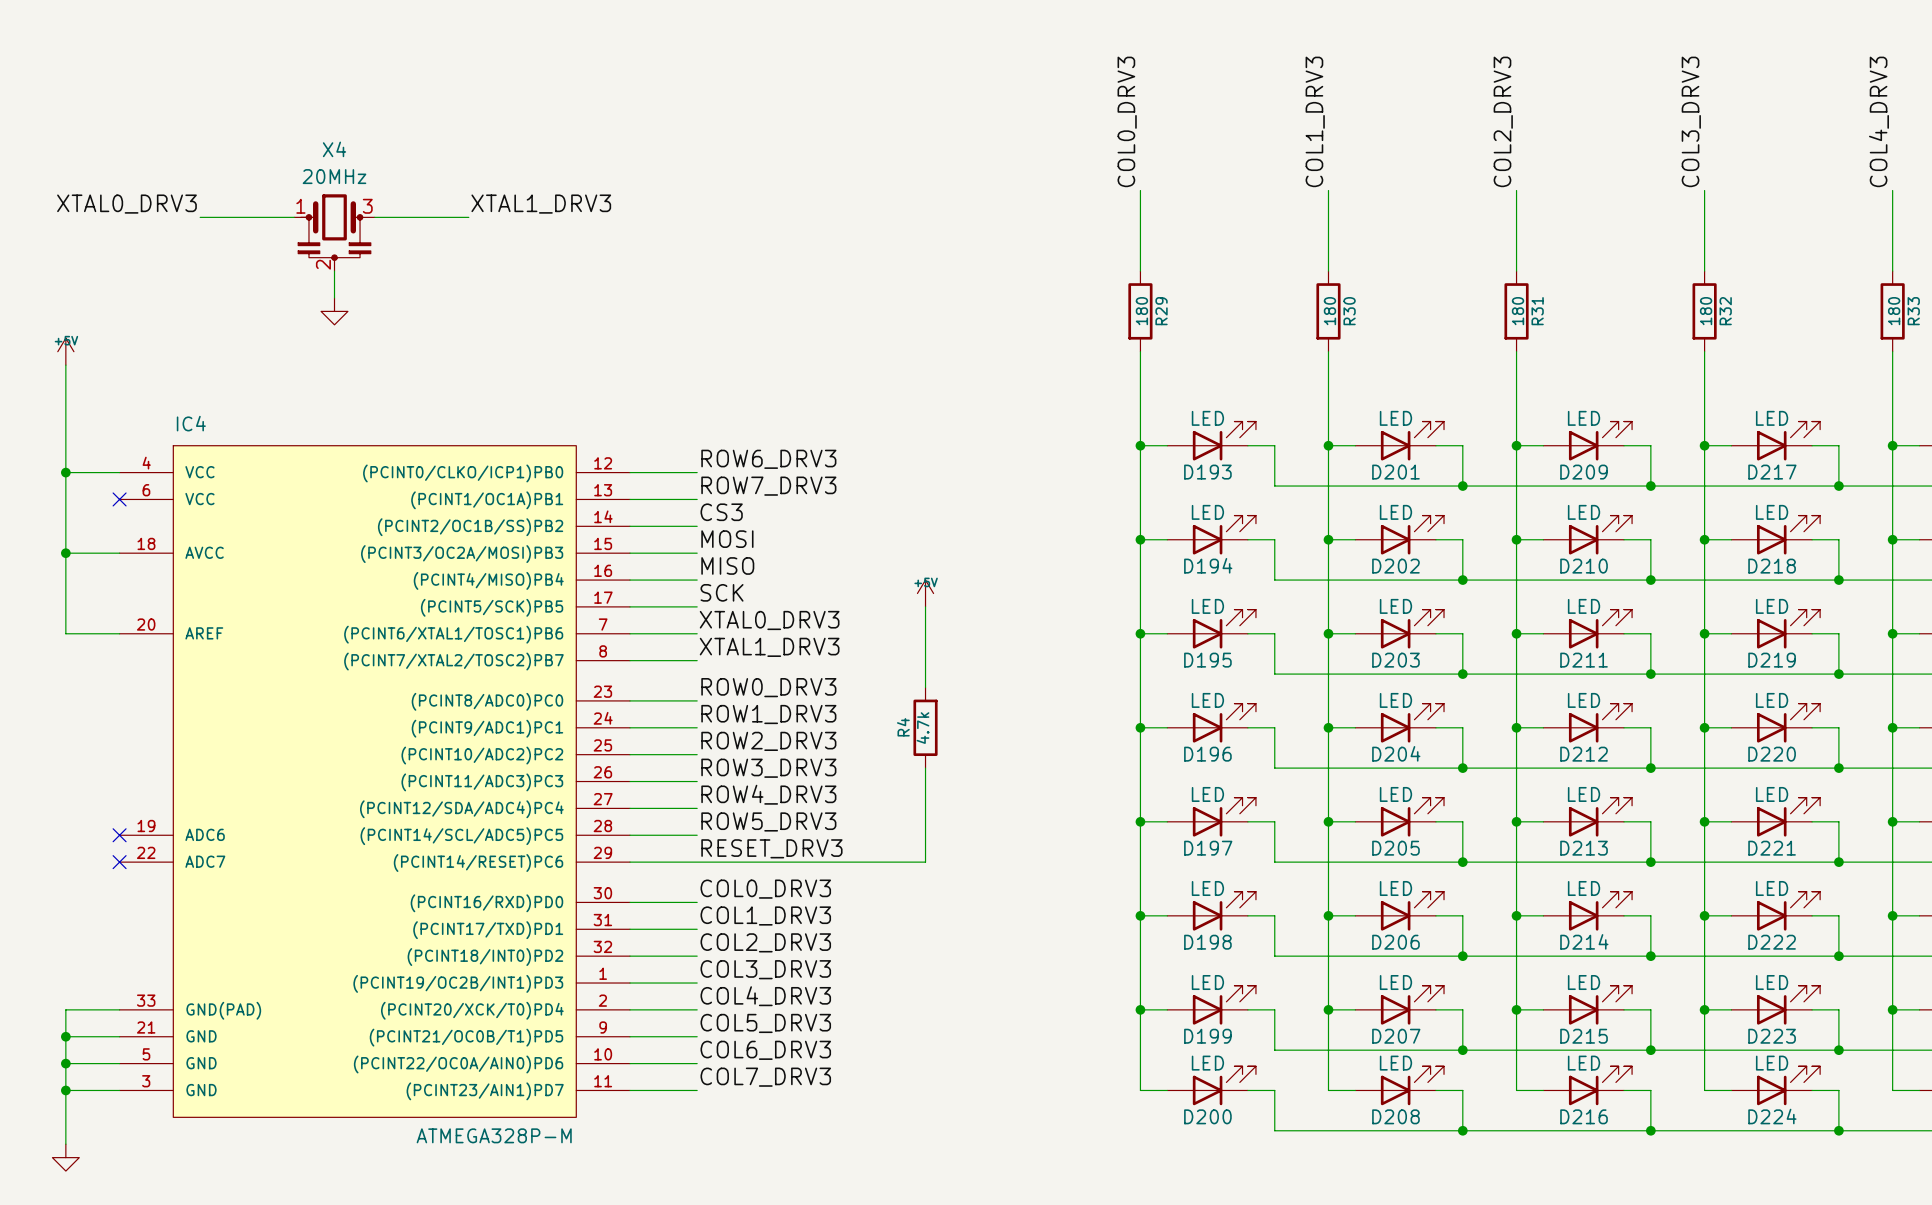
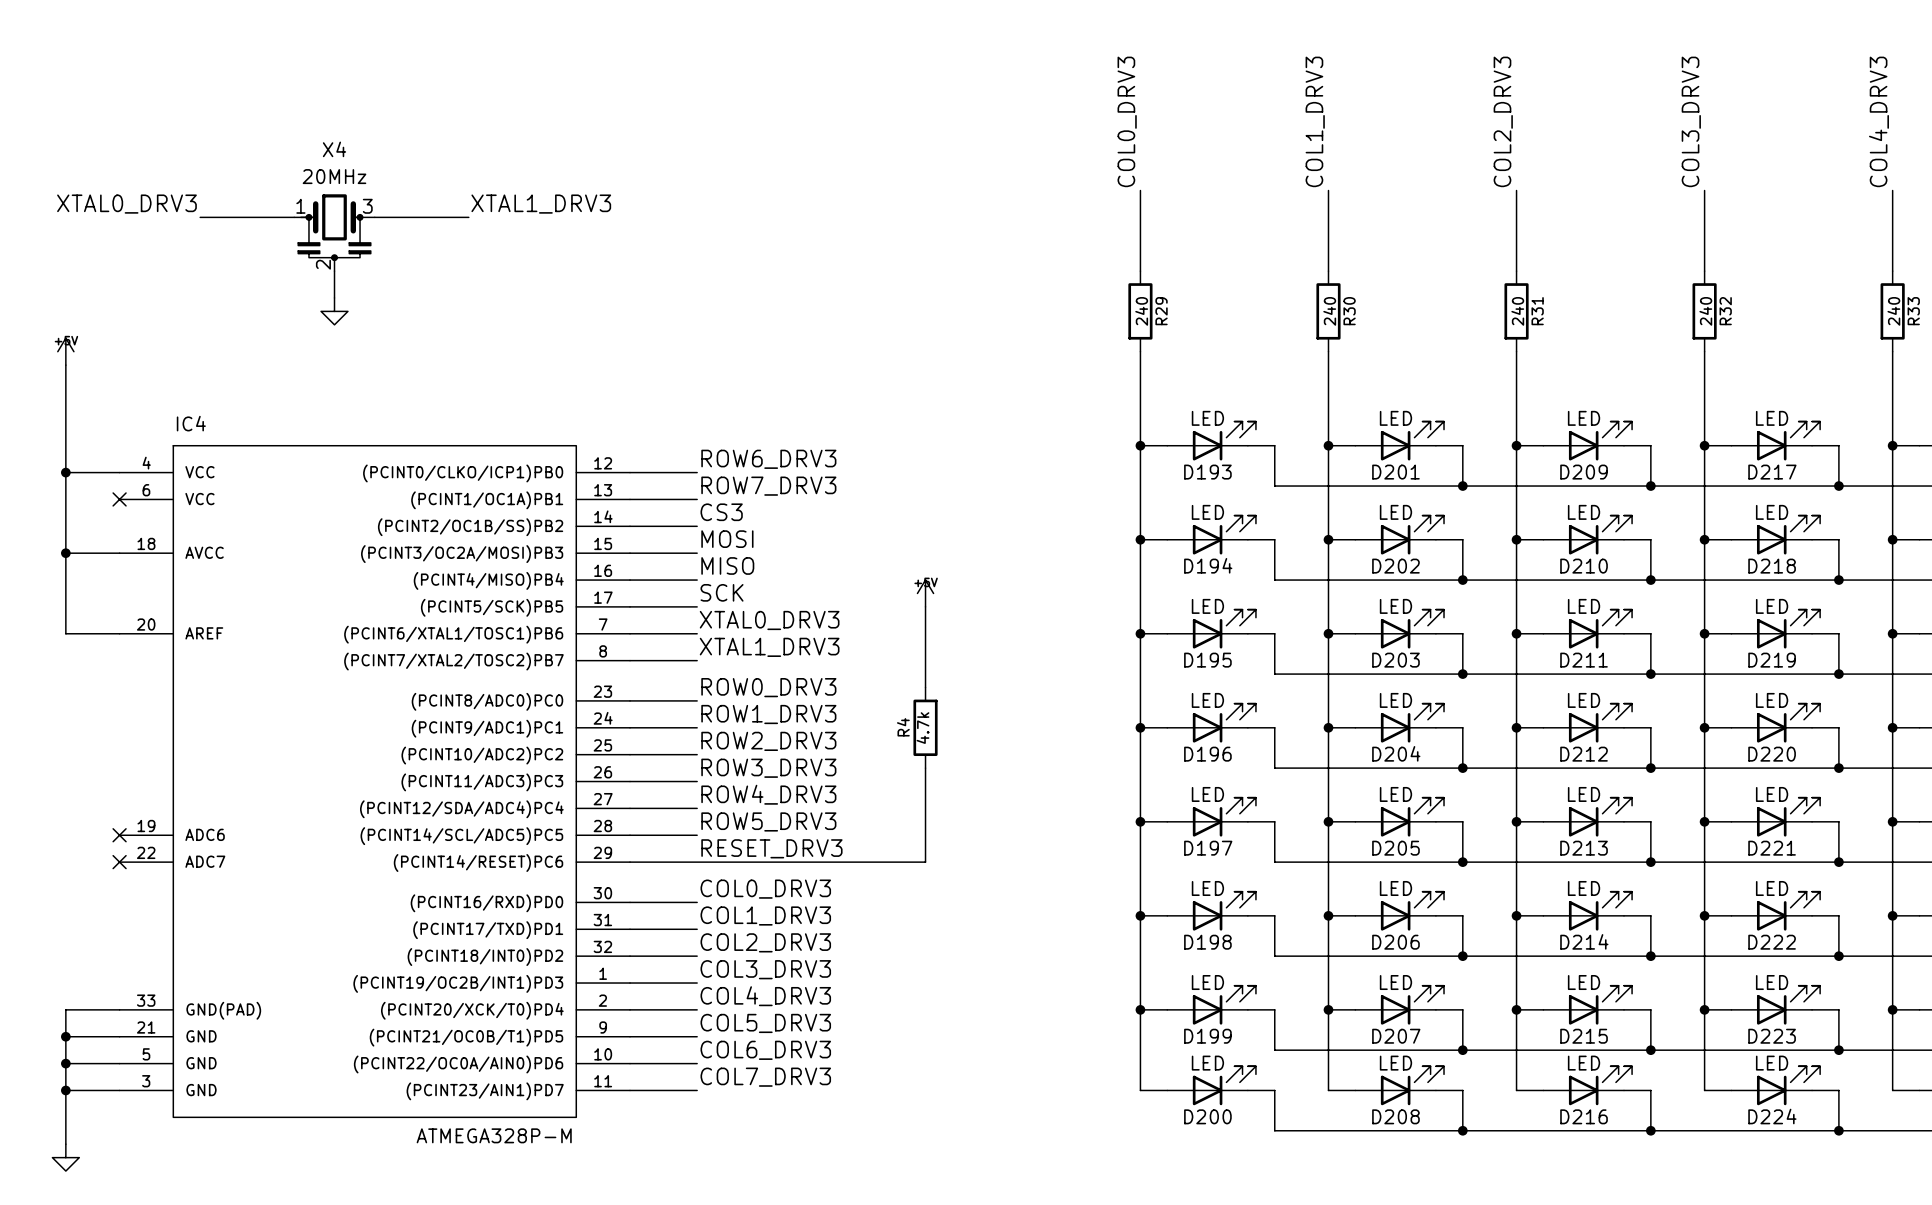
R29 value: 180 (1141, 311) -> 240 (1141, 311)
R30 value: 180 (1329, 311) -> 240 (1329, 311)
R31 value: 180 (1518, 311) -> 240 (1517, 311)
R32 value: 180 (1706, 311) -> 240 (1705, 311)
R33 value: 180 (1894, 311) -> 240 (1893, 311)

